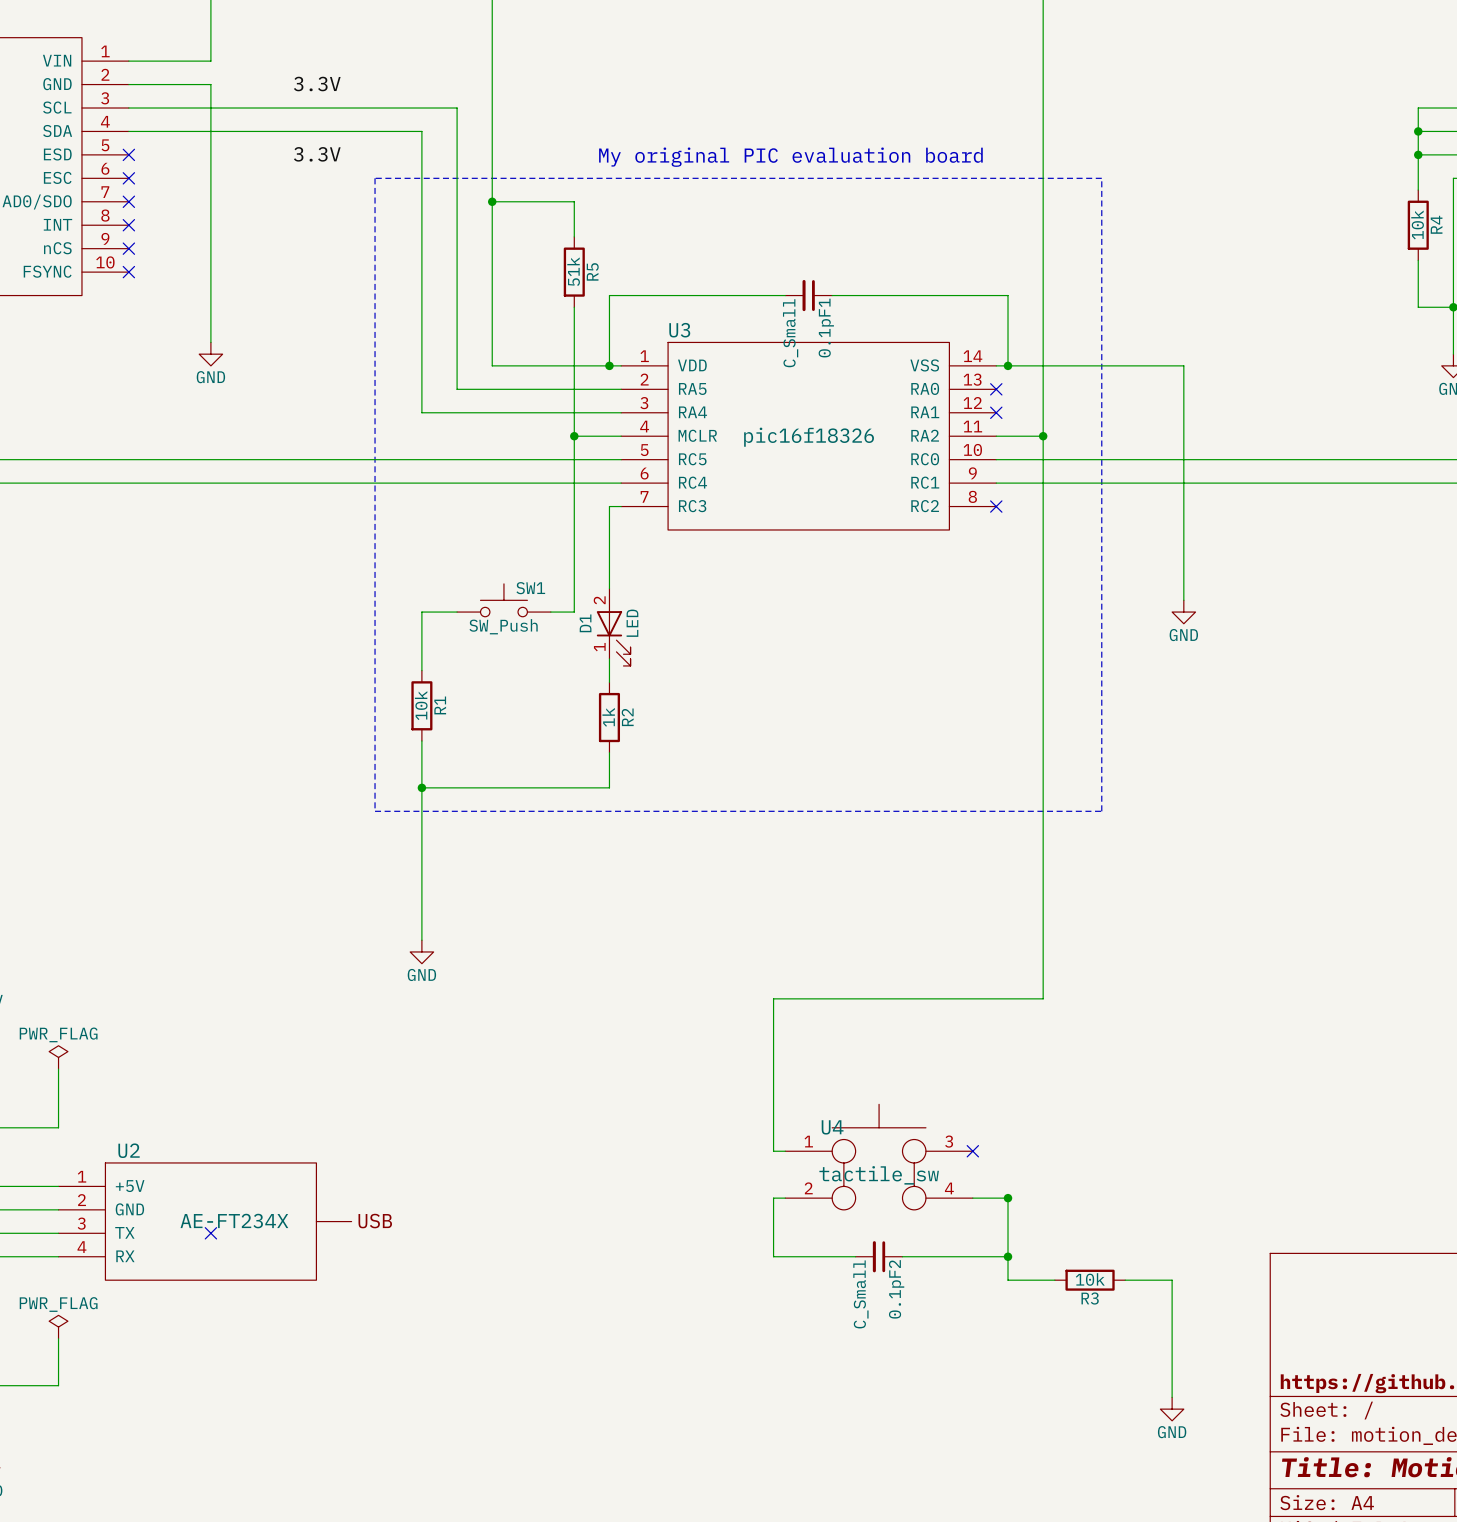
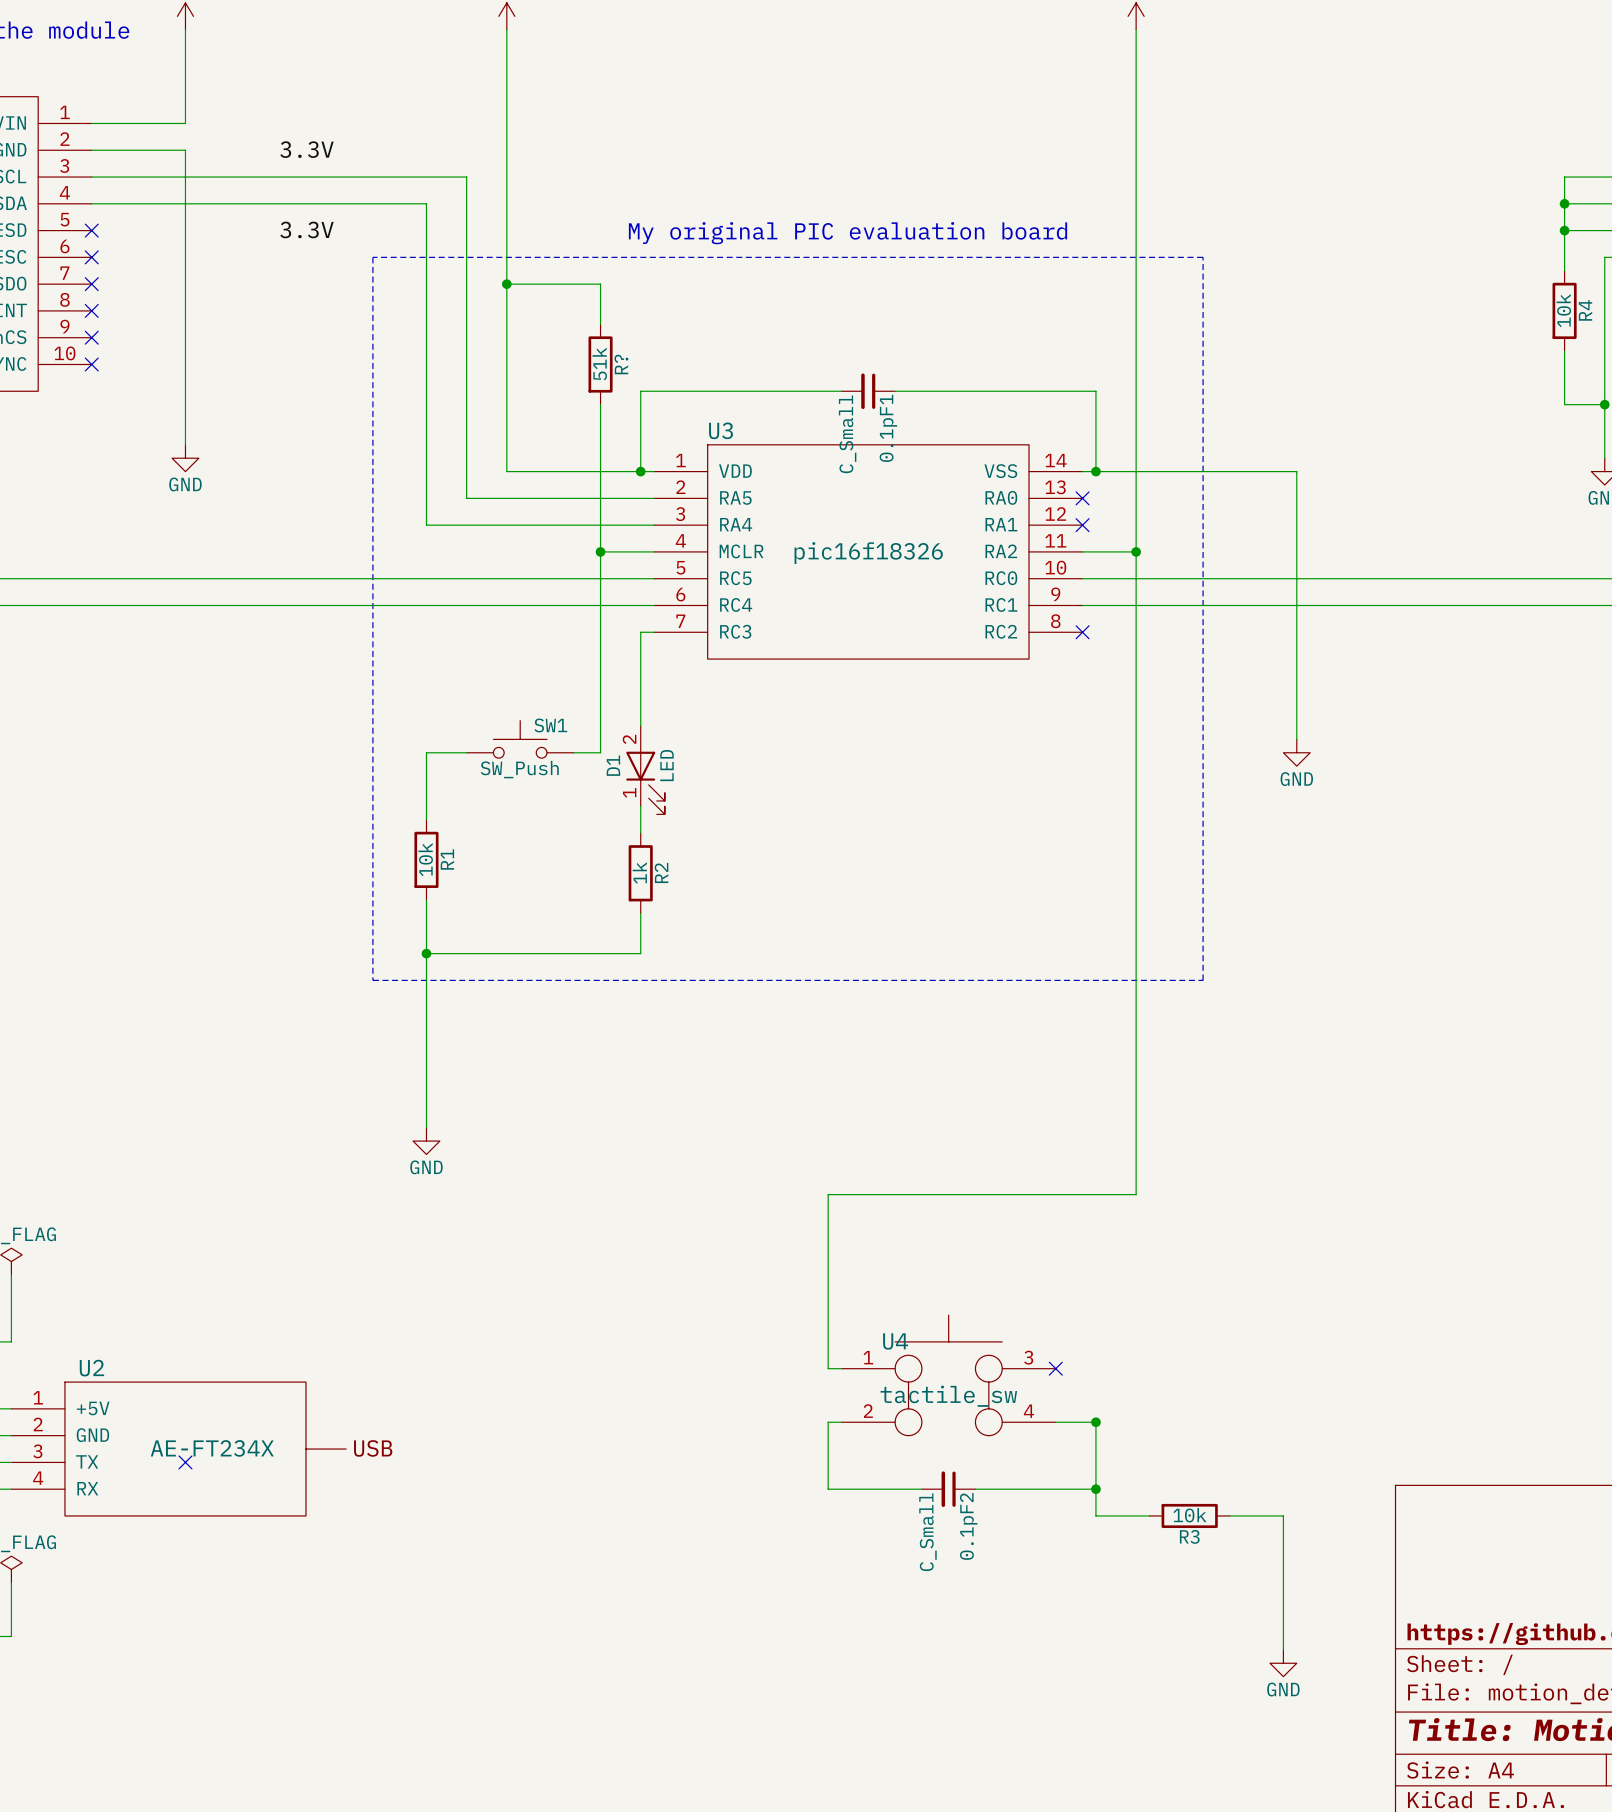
R5 name: R5 (592, 271) -> R? (621, 364)

